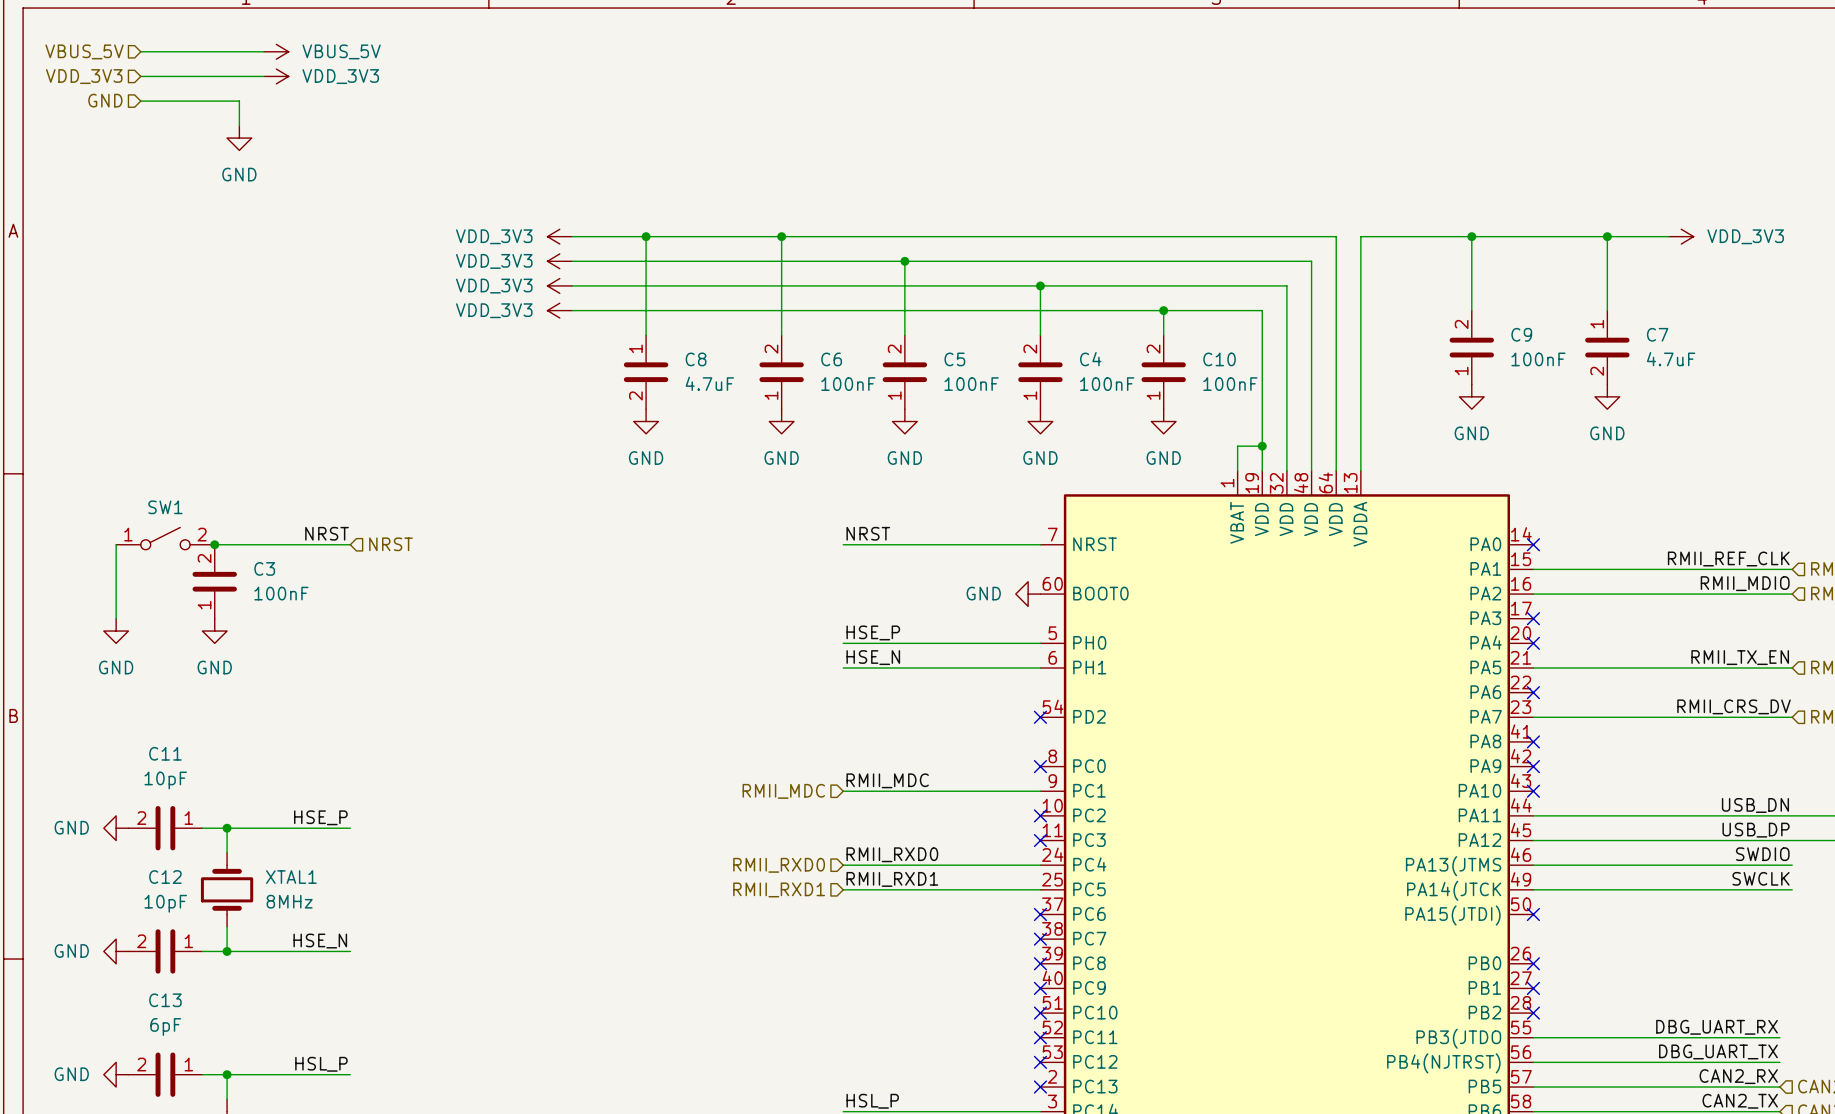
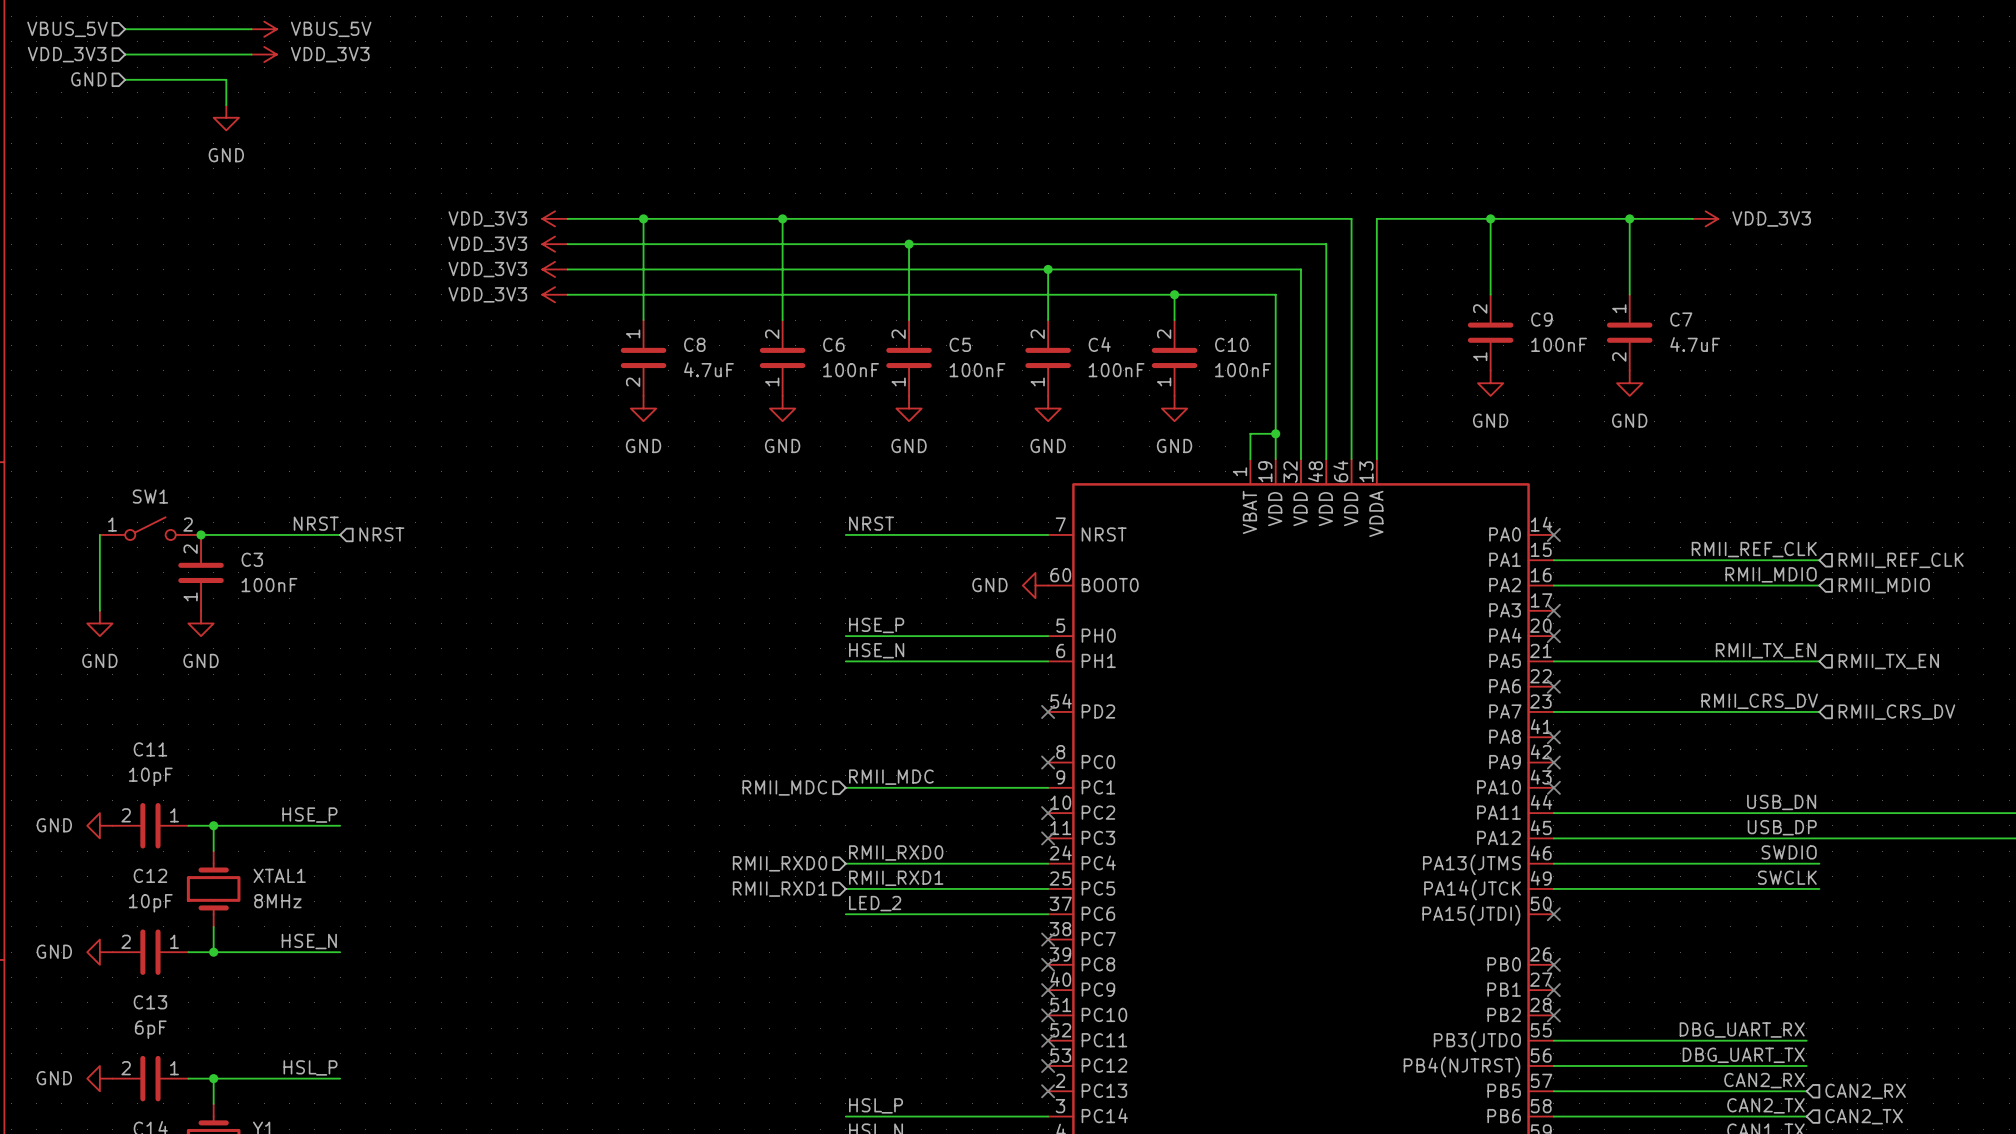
label: none -> LED_2 (875, 903)
wire: none -> (845, 914) (1048, 914)
no-connect mark: (1040, 914) -> none

